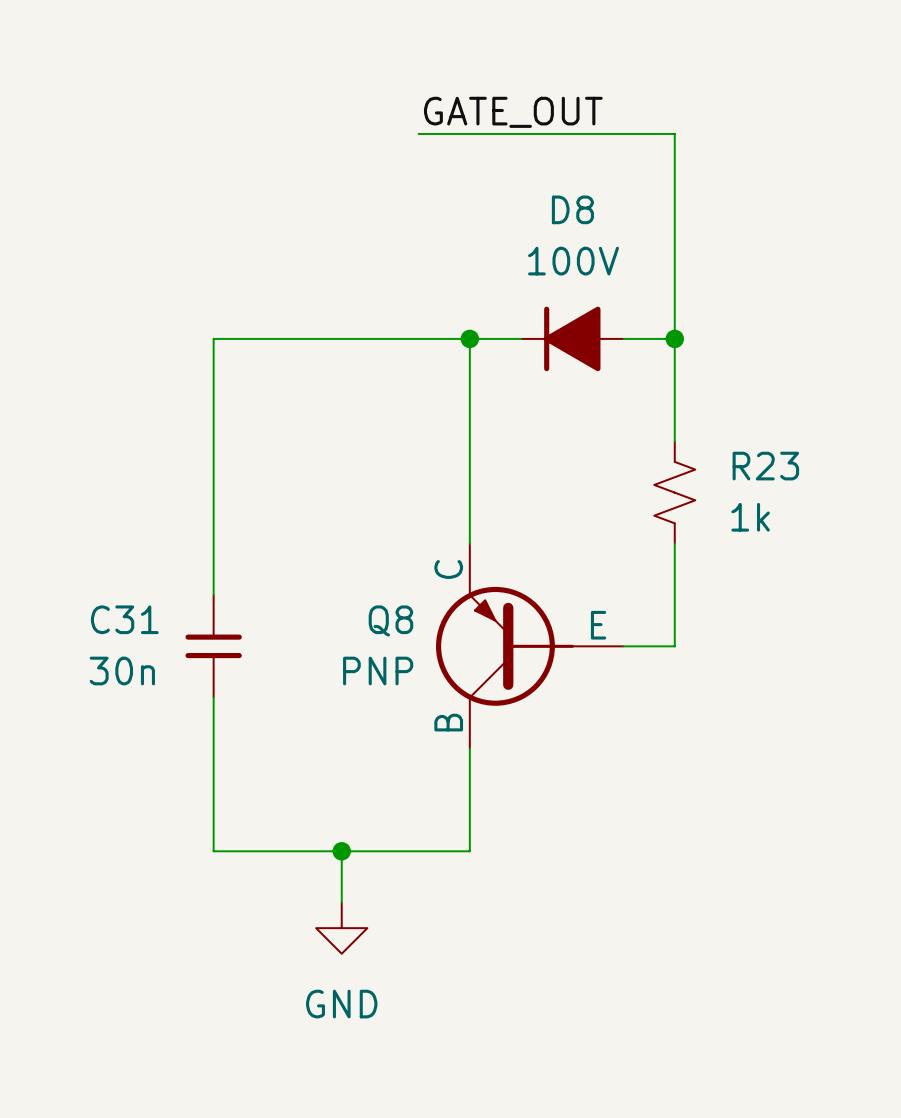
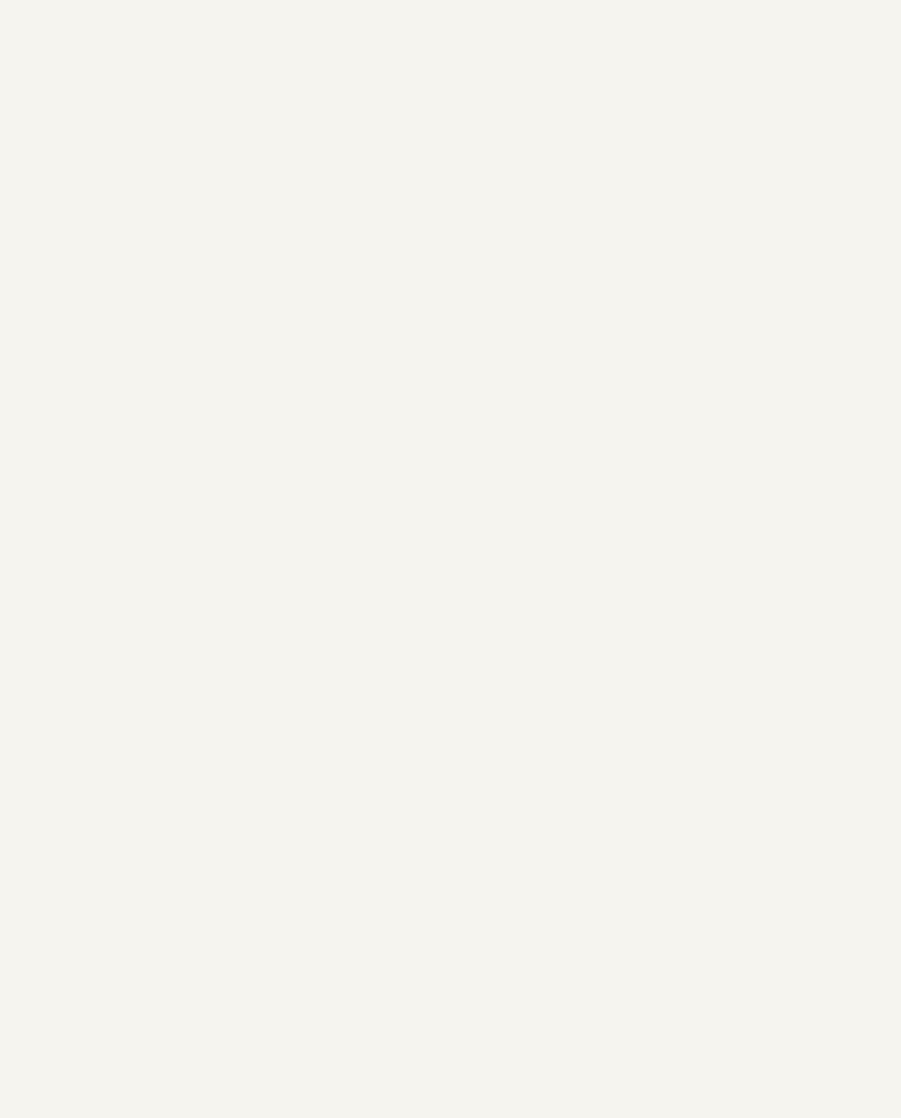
label: GATE_OUT (513, 112) -> none
wire: (418, 133) (674, 133) (674, 441) -> none
wire: (469, 338) (469, 543) -> none
junction: (469, 338) -> none
wire: (521, 338) (213, 338) (213, 595) -> none
D8: 100V (572, 338) -> none
wire: (623, 338) (674, 338) -> none
junction: (674, 338) -> none
R23: 1k (674, 492) -> none
wire: (674, 543) (674, 646) (623, 646) -> none
C31: 30n (213, 646) -> none
Q8: PNP (529, 646) -> none
wire: (213, 697) (213, 851) (469, 851) (469, 748) -> none
wire: (341, 851) (341, 902) -> none
junction: (341, 851) -> none
power symbol: GND (341, 928) -> none

